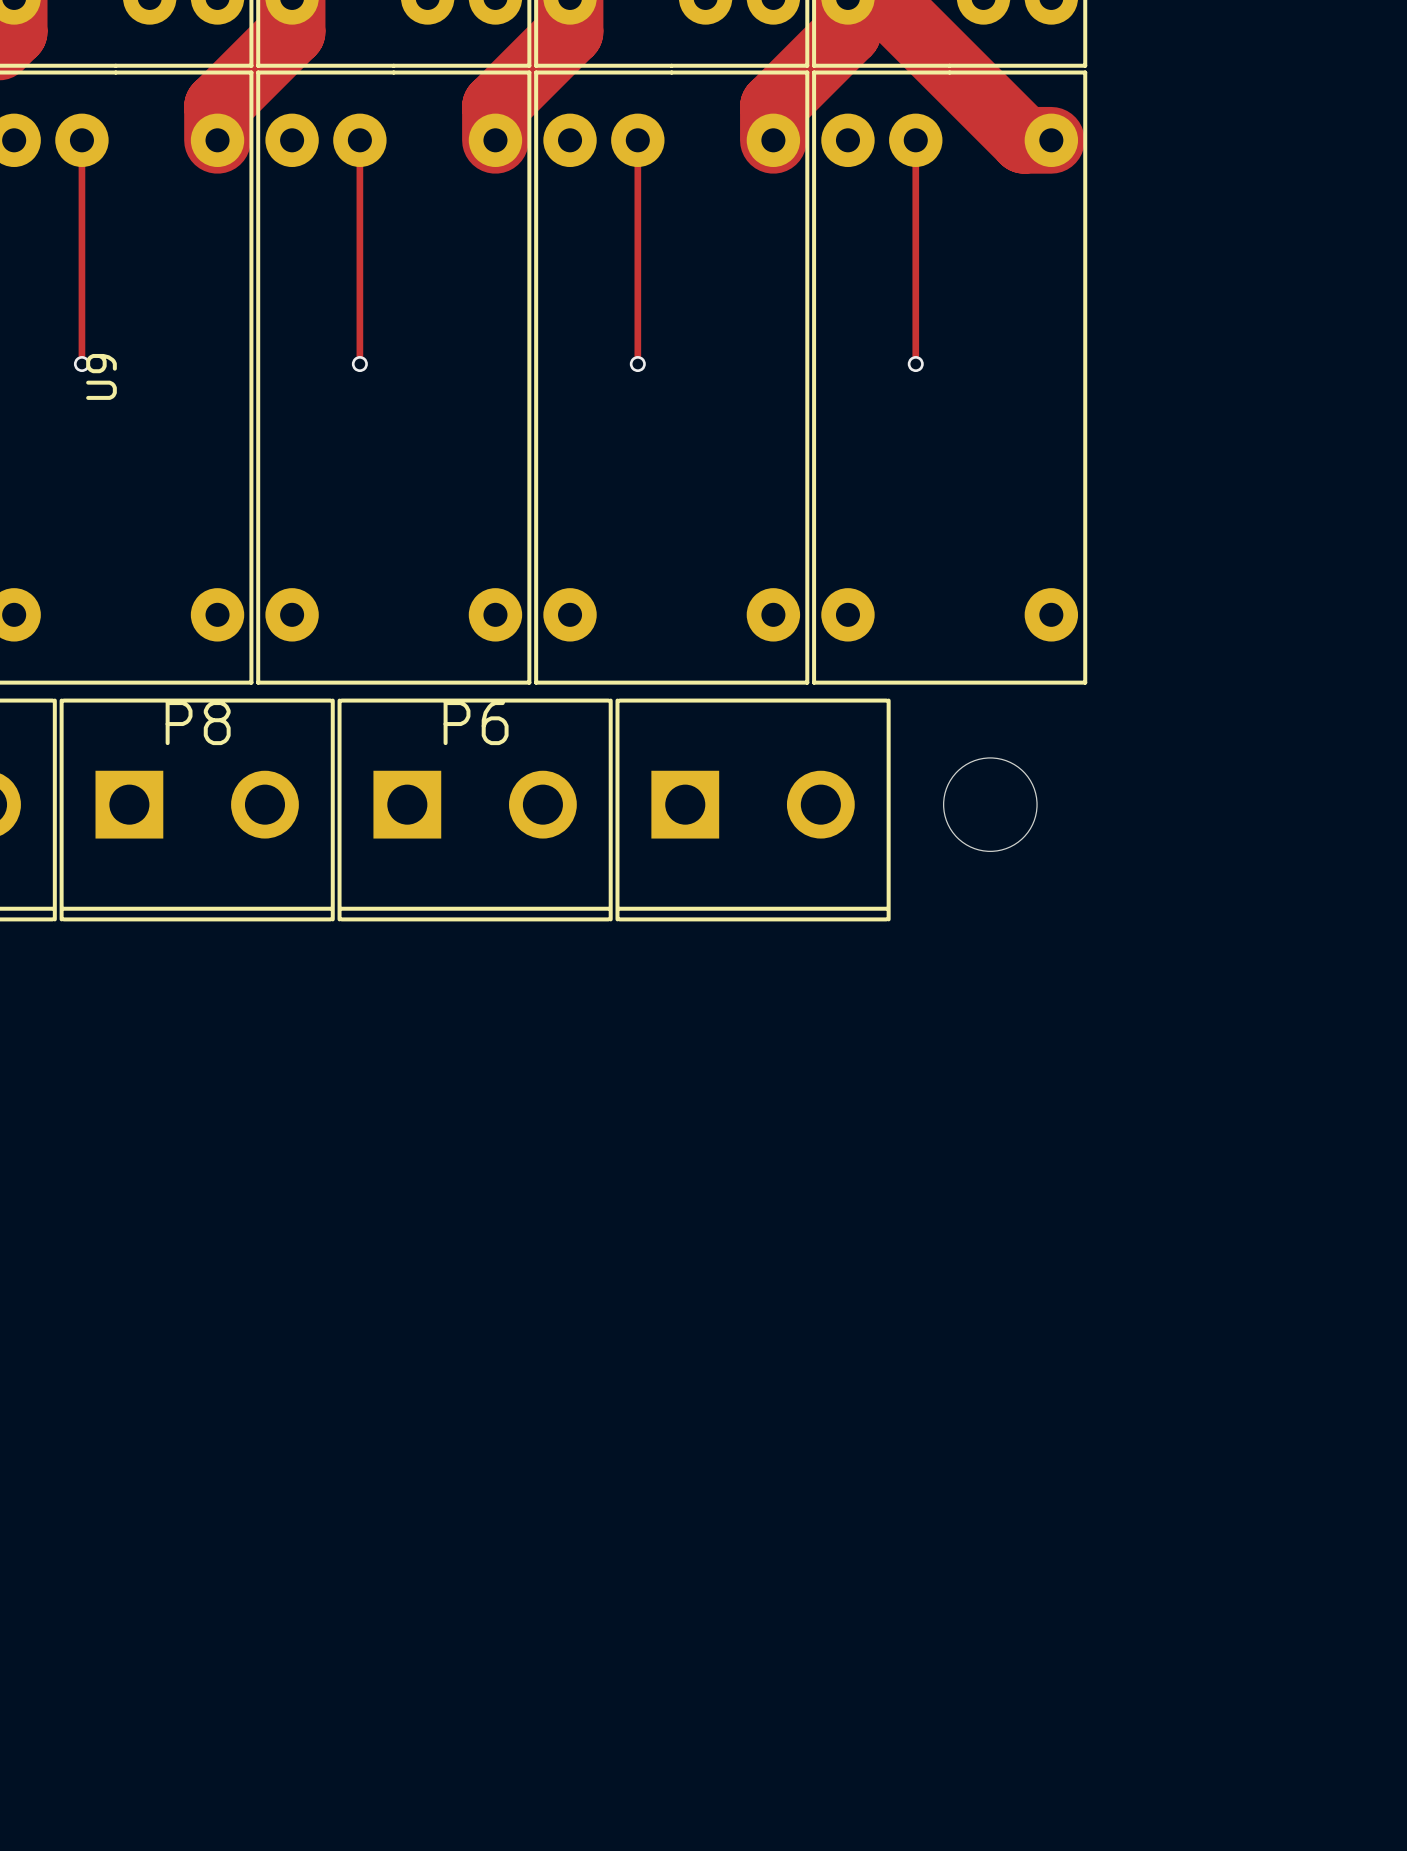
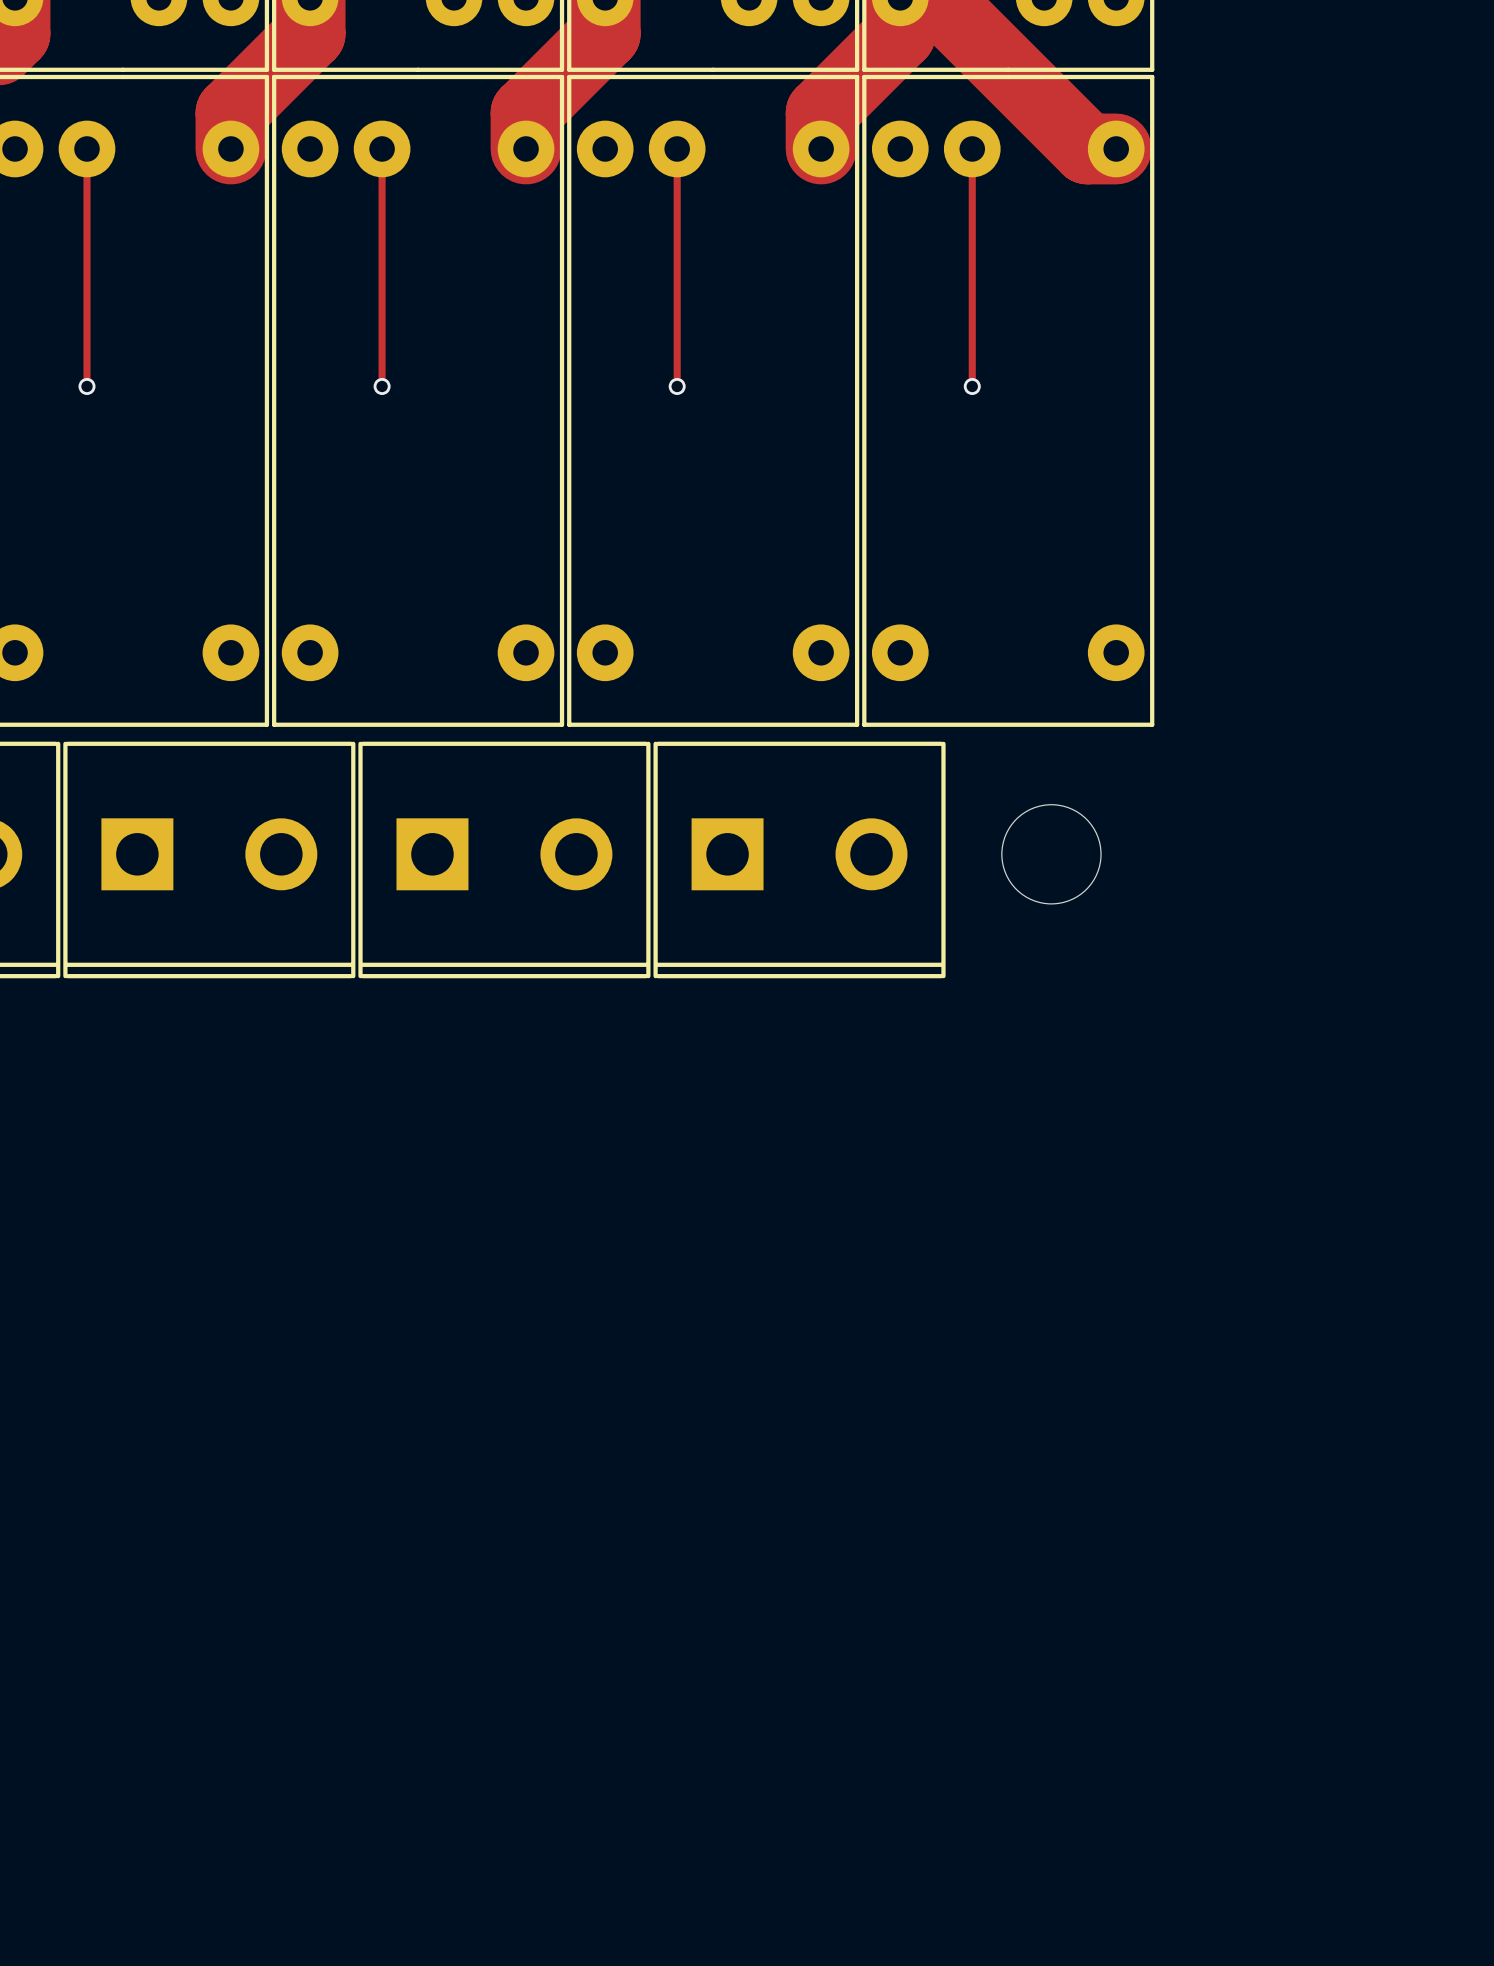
U9 name: U9 (101, 376) -> none
P8 name: P8 (198, 723) -> none
P6 name: P6 (476, 723) -> none

